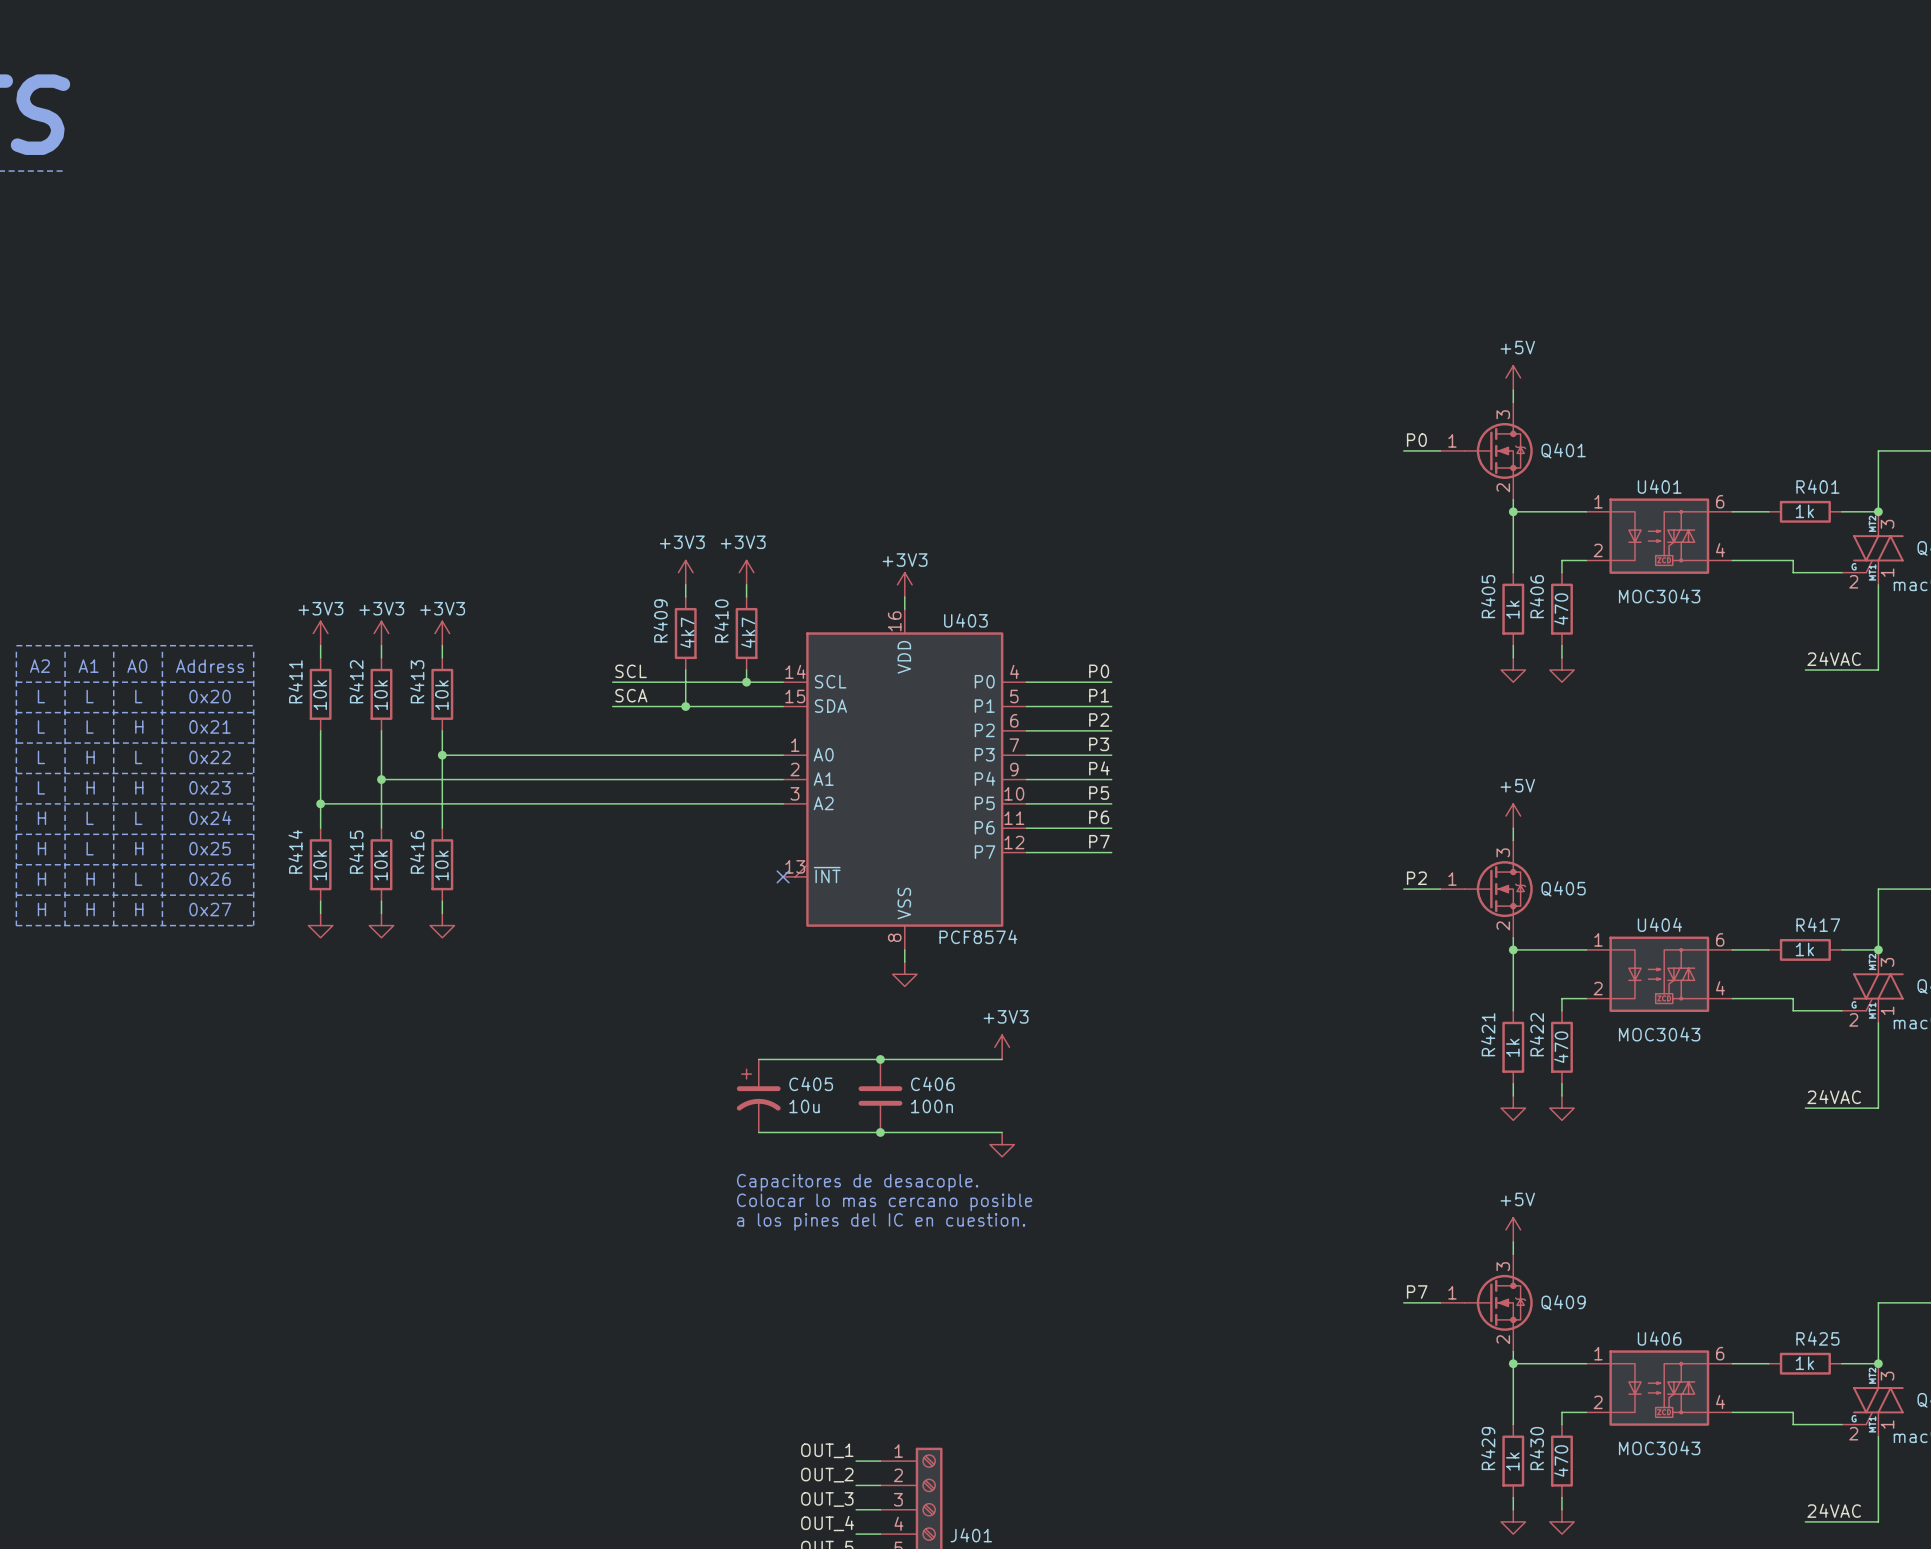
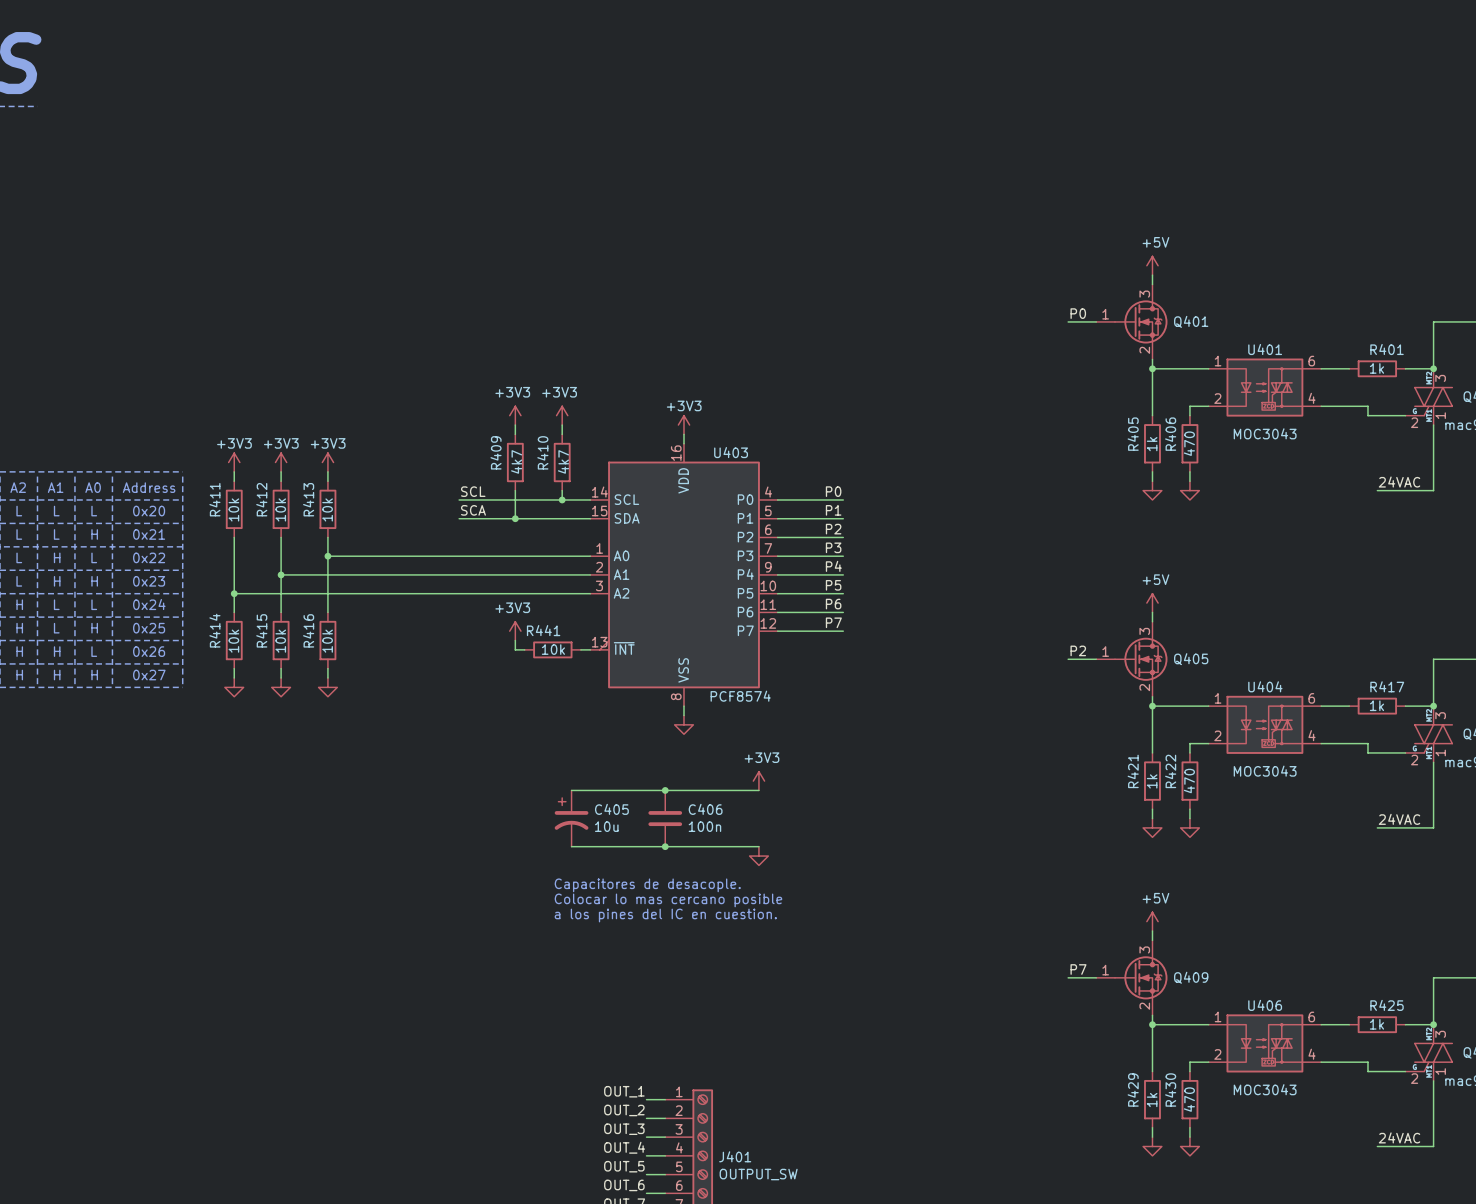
power symbol: none -> +3V3 (515, 631)
wire: none -> (515, 640) (515, 649) (524, 649)
R441: none -> 10k (552, 649)
wire: none -> (580, 649) (590, 649)
no-connect mark: (783, 876) -> none

